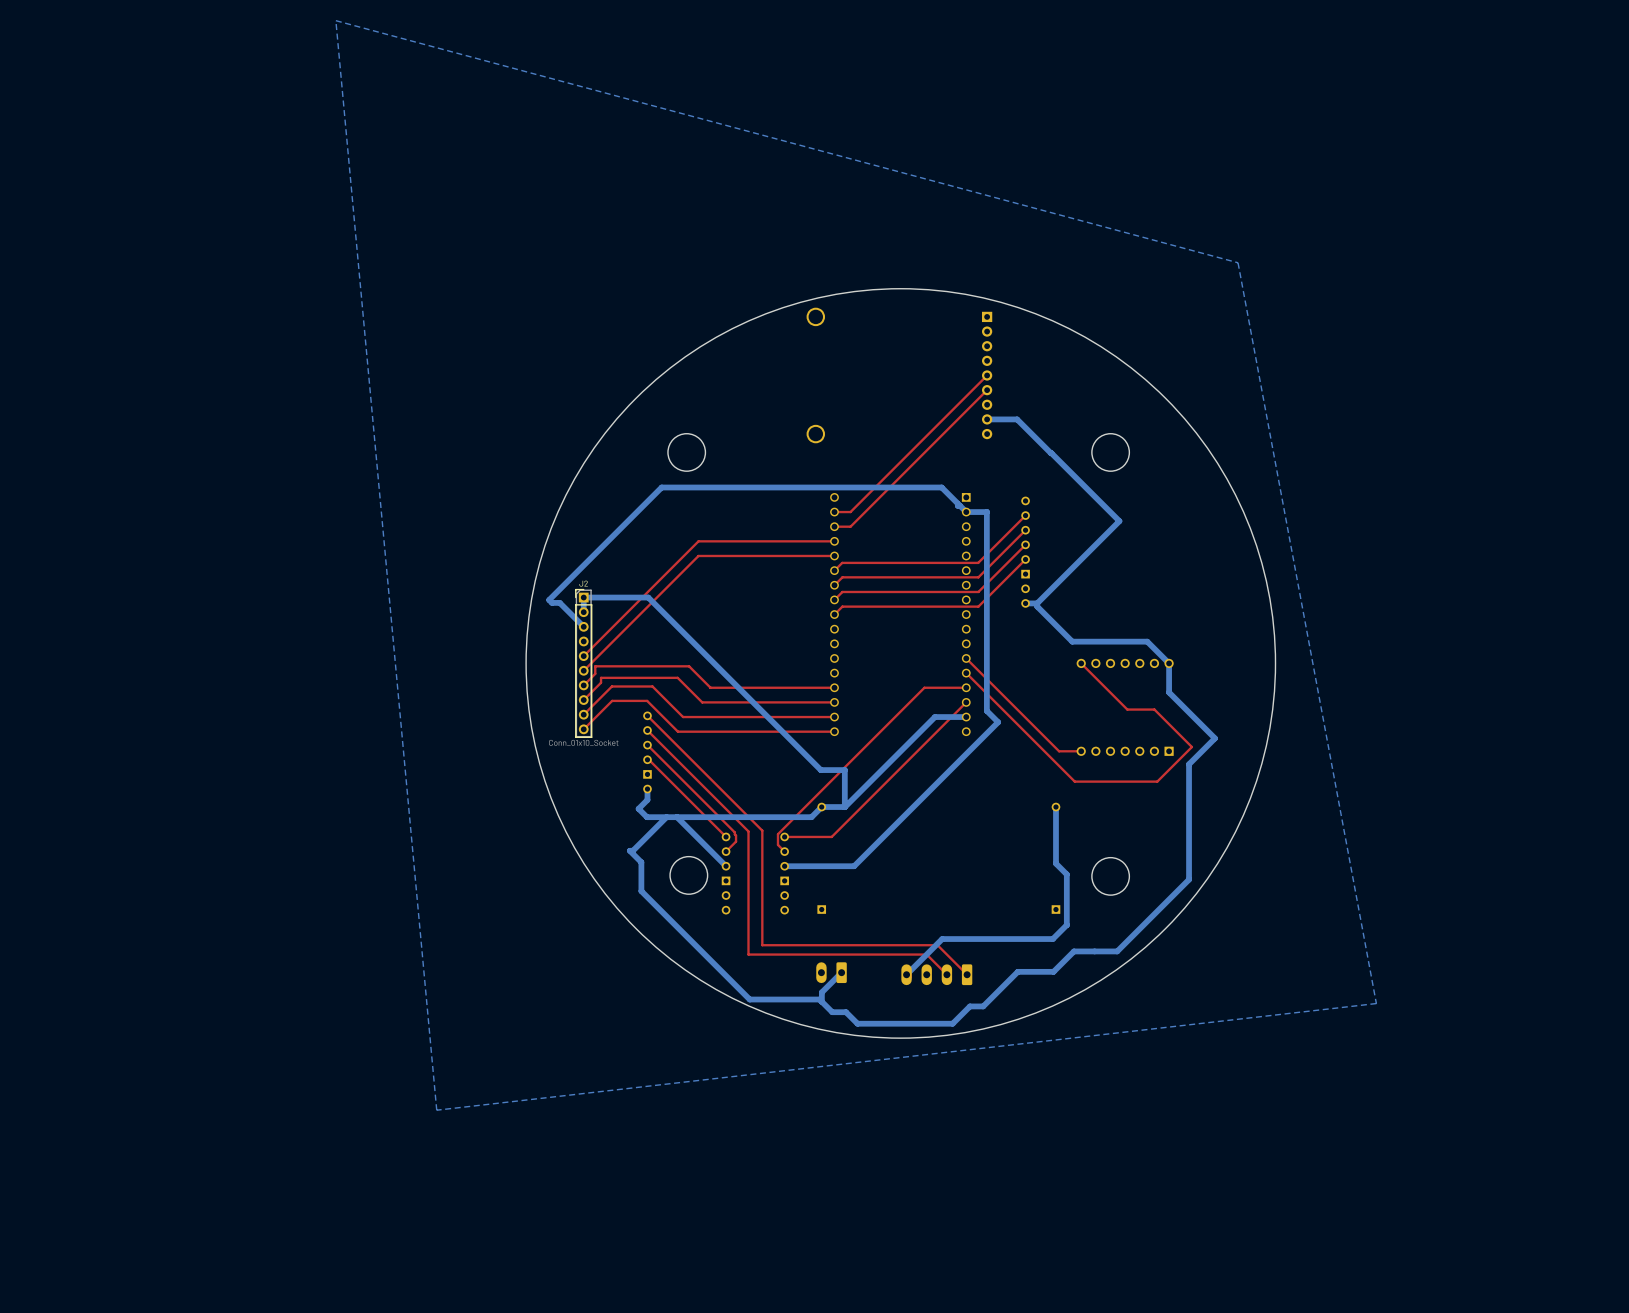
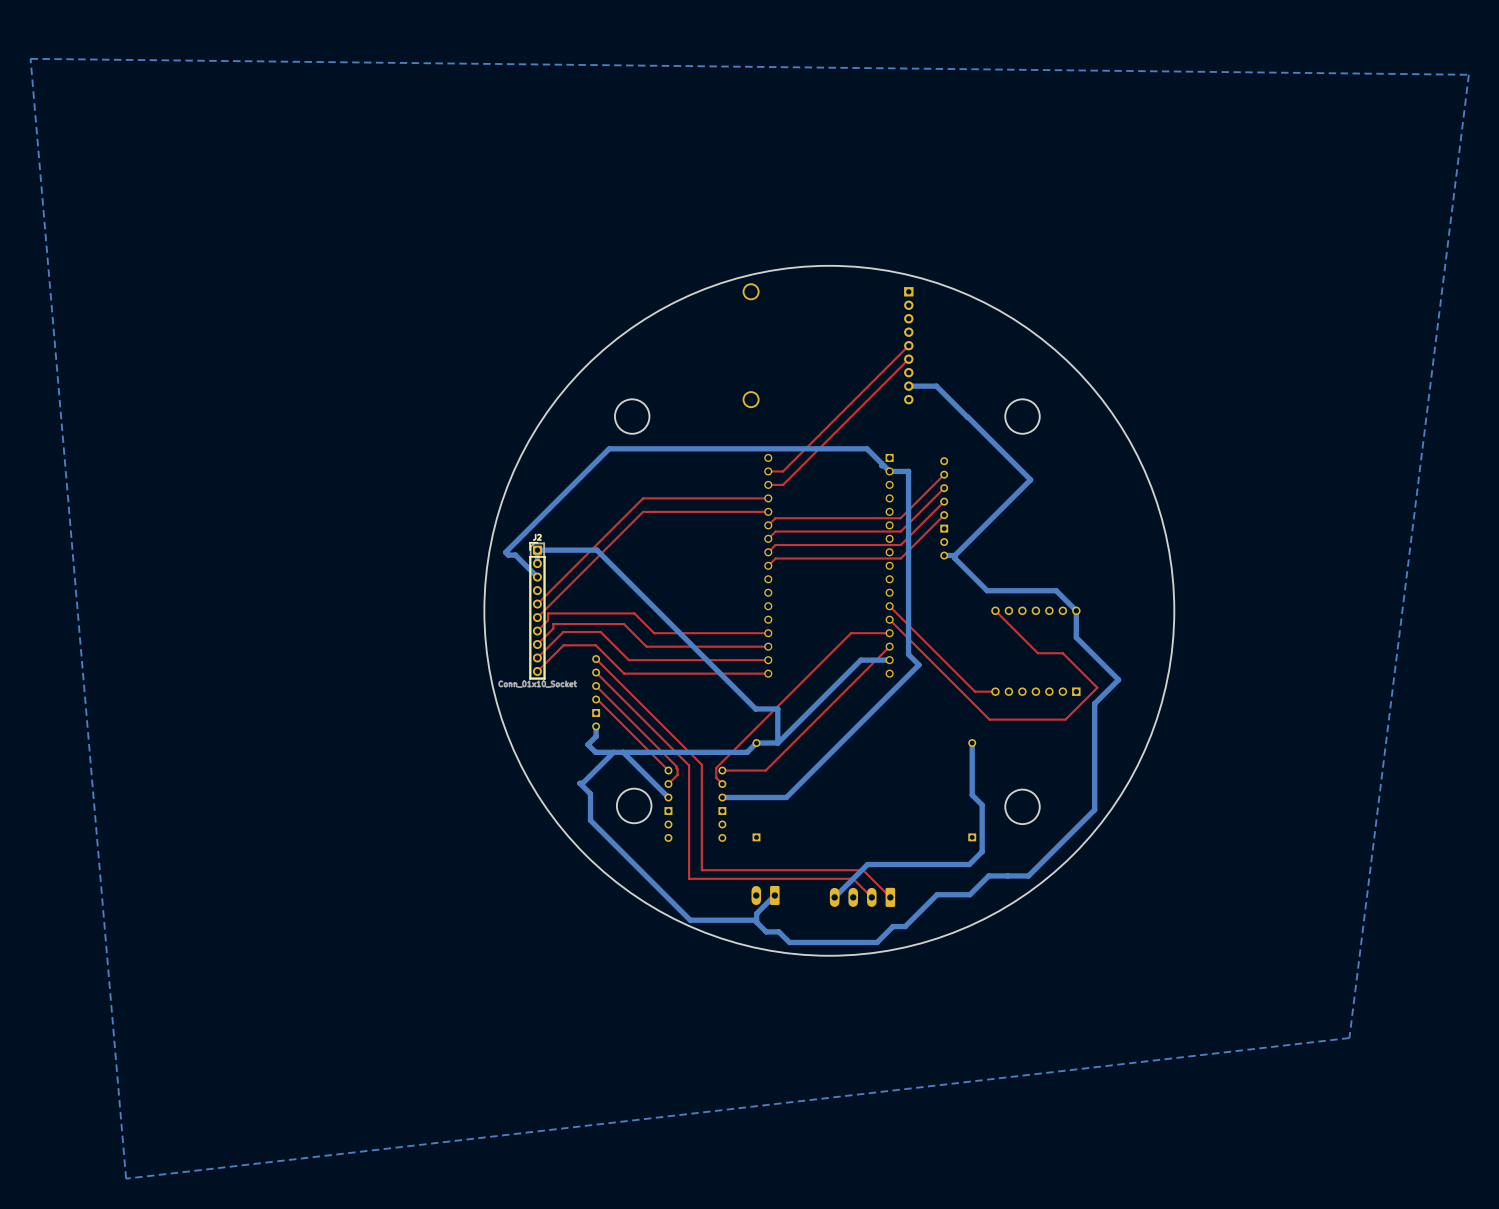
bottom zone outline: (335, 20) (436, 1110) (1376, 1003) (1238, 262) (335, 20) -> (30, 58) (1468, 74) (1349, 1038) (126, 1178) (30, 58)

